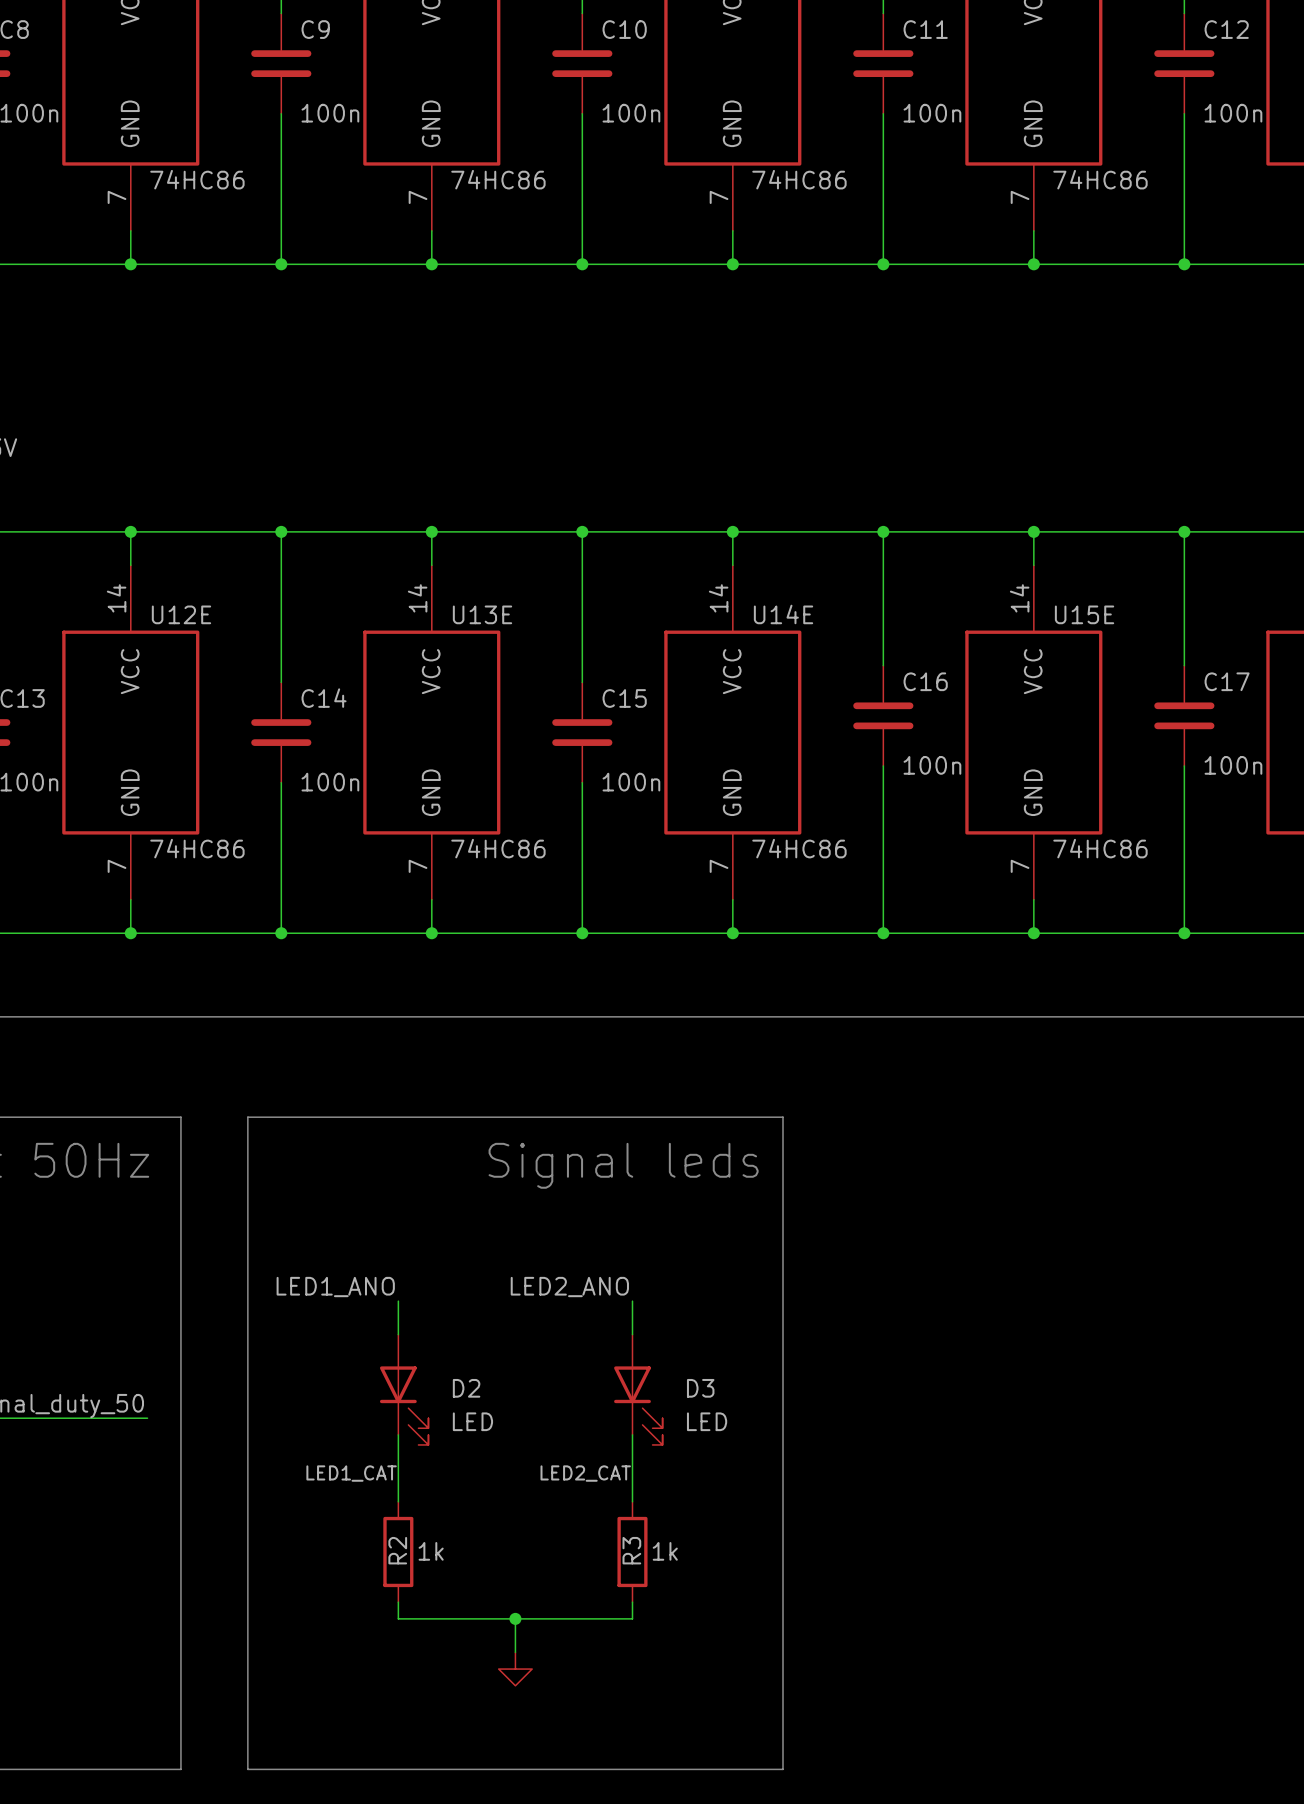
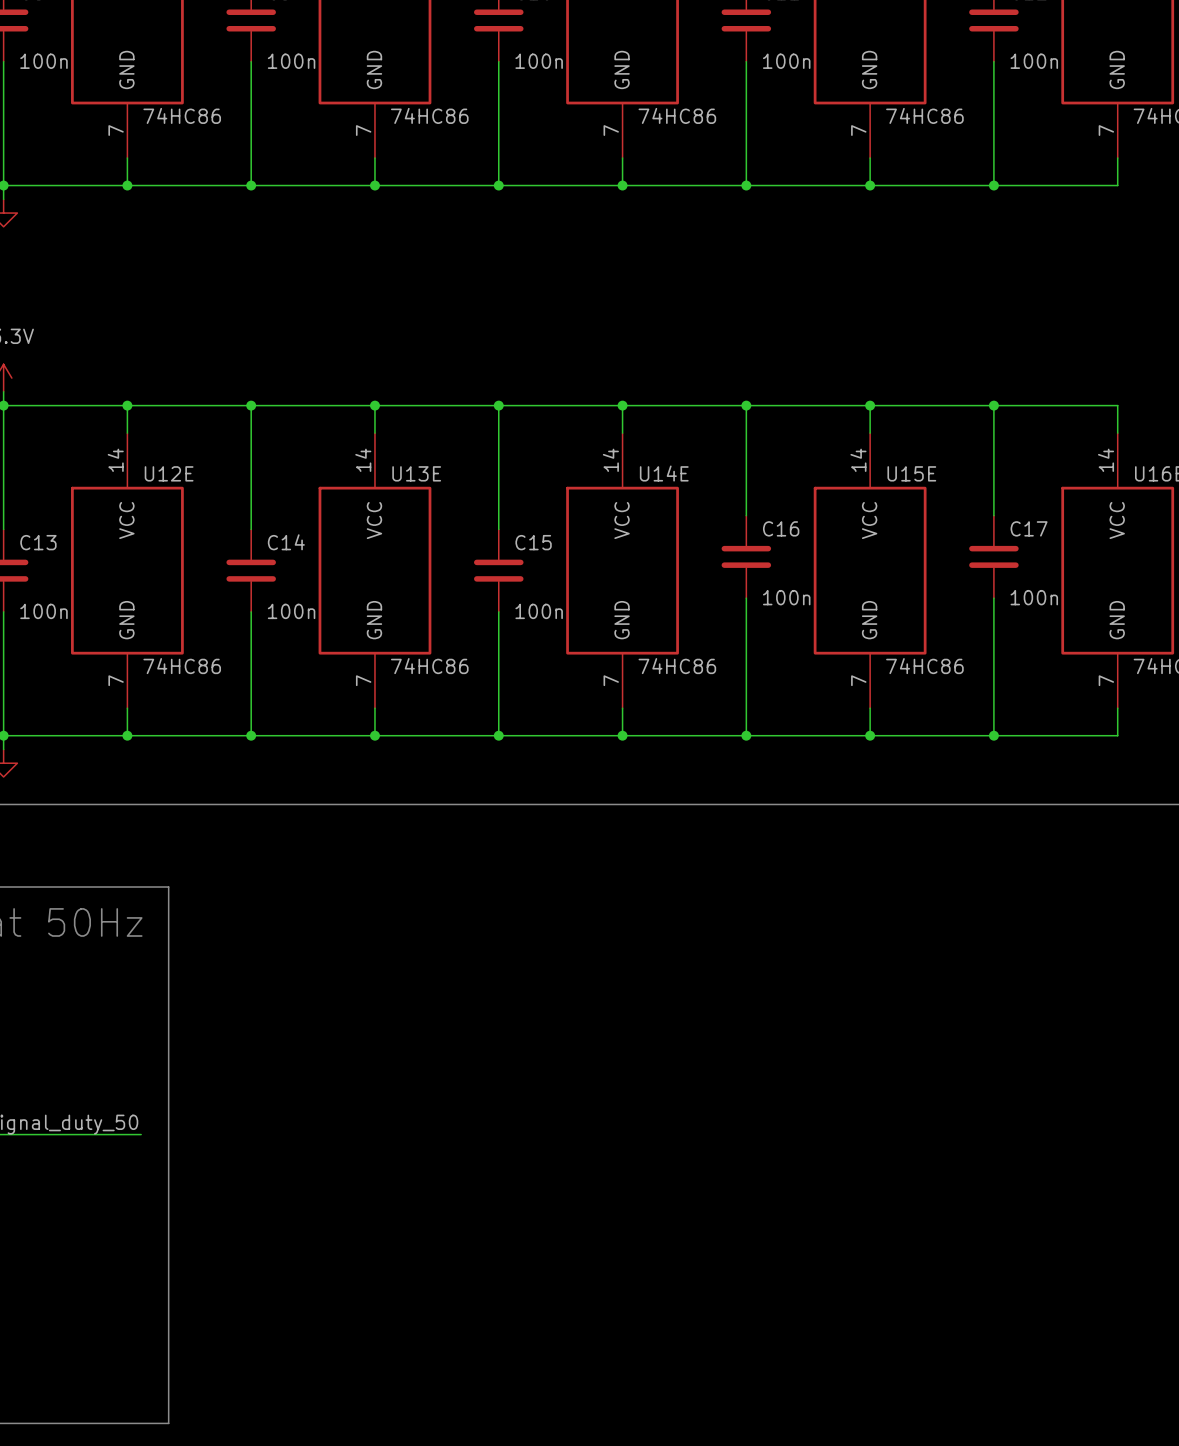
line: (247, 1117) (782, 1117) (782, 1769) (247, 1769) (247, 1117) -> none
text: Signal leds (623, 1165) -> none
label: LED1_ANO (335, 1287) -> none
label: LED2_ANO (569, 1287) -> none
wire: (398, 1301) (398, 1334) -> none
wire: (632, 1301) (632, 1334) -> none
D2: LED (404, 1389) -> none
D3: LED (638, 1389) -> none
wire: (398, 1434) (398, 1501) -> none
wire: (632, 1434) (632, 1501) -> none
label: LED1_CAT (351, 1473) -> none
label: LED2_CAT (585, 1473) -> none
R2: 1k (398, 1551) -> none
R3: 1k (632, 1551) -> none
wire: (398, 1602) (398, 1618) (632, 1618) (632, 1602) -> none
wire: (515, 1618) (515, 1652) -> none
junction: (515, 1618) -> none
power symbol: (515, 1669) -> none

